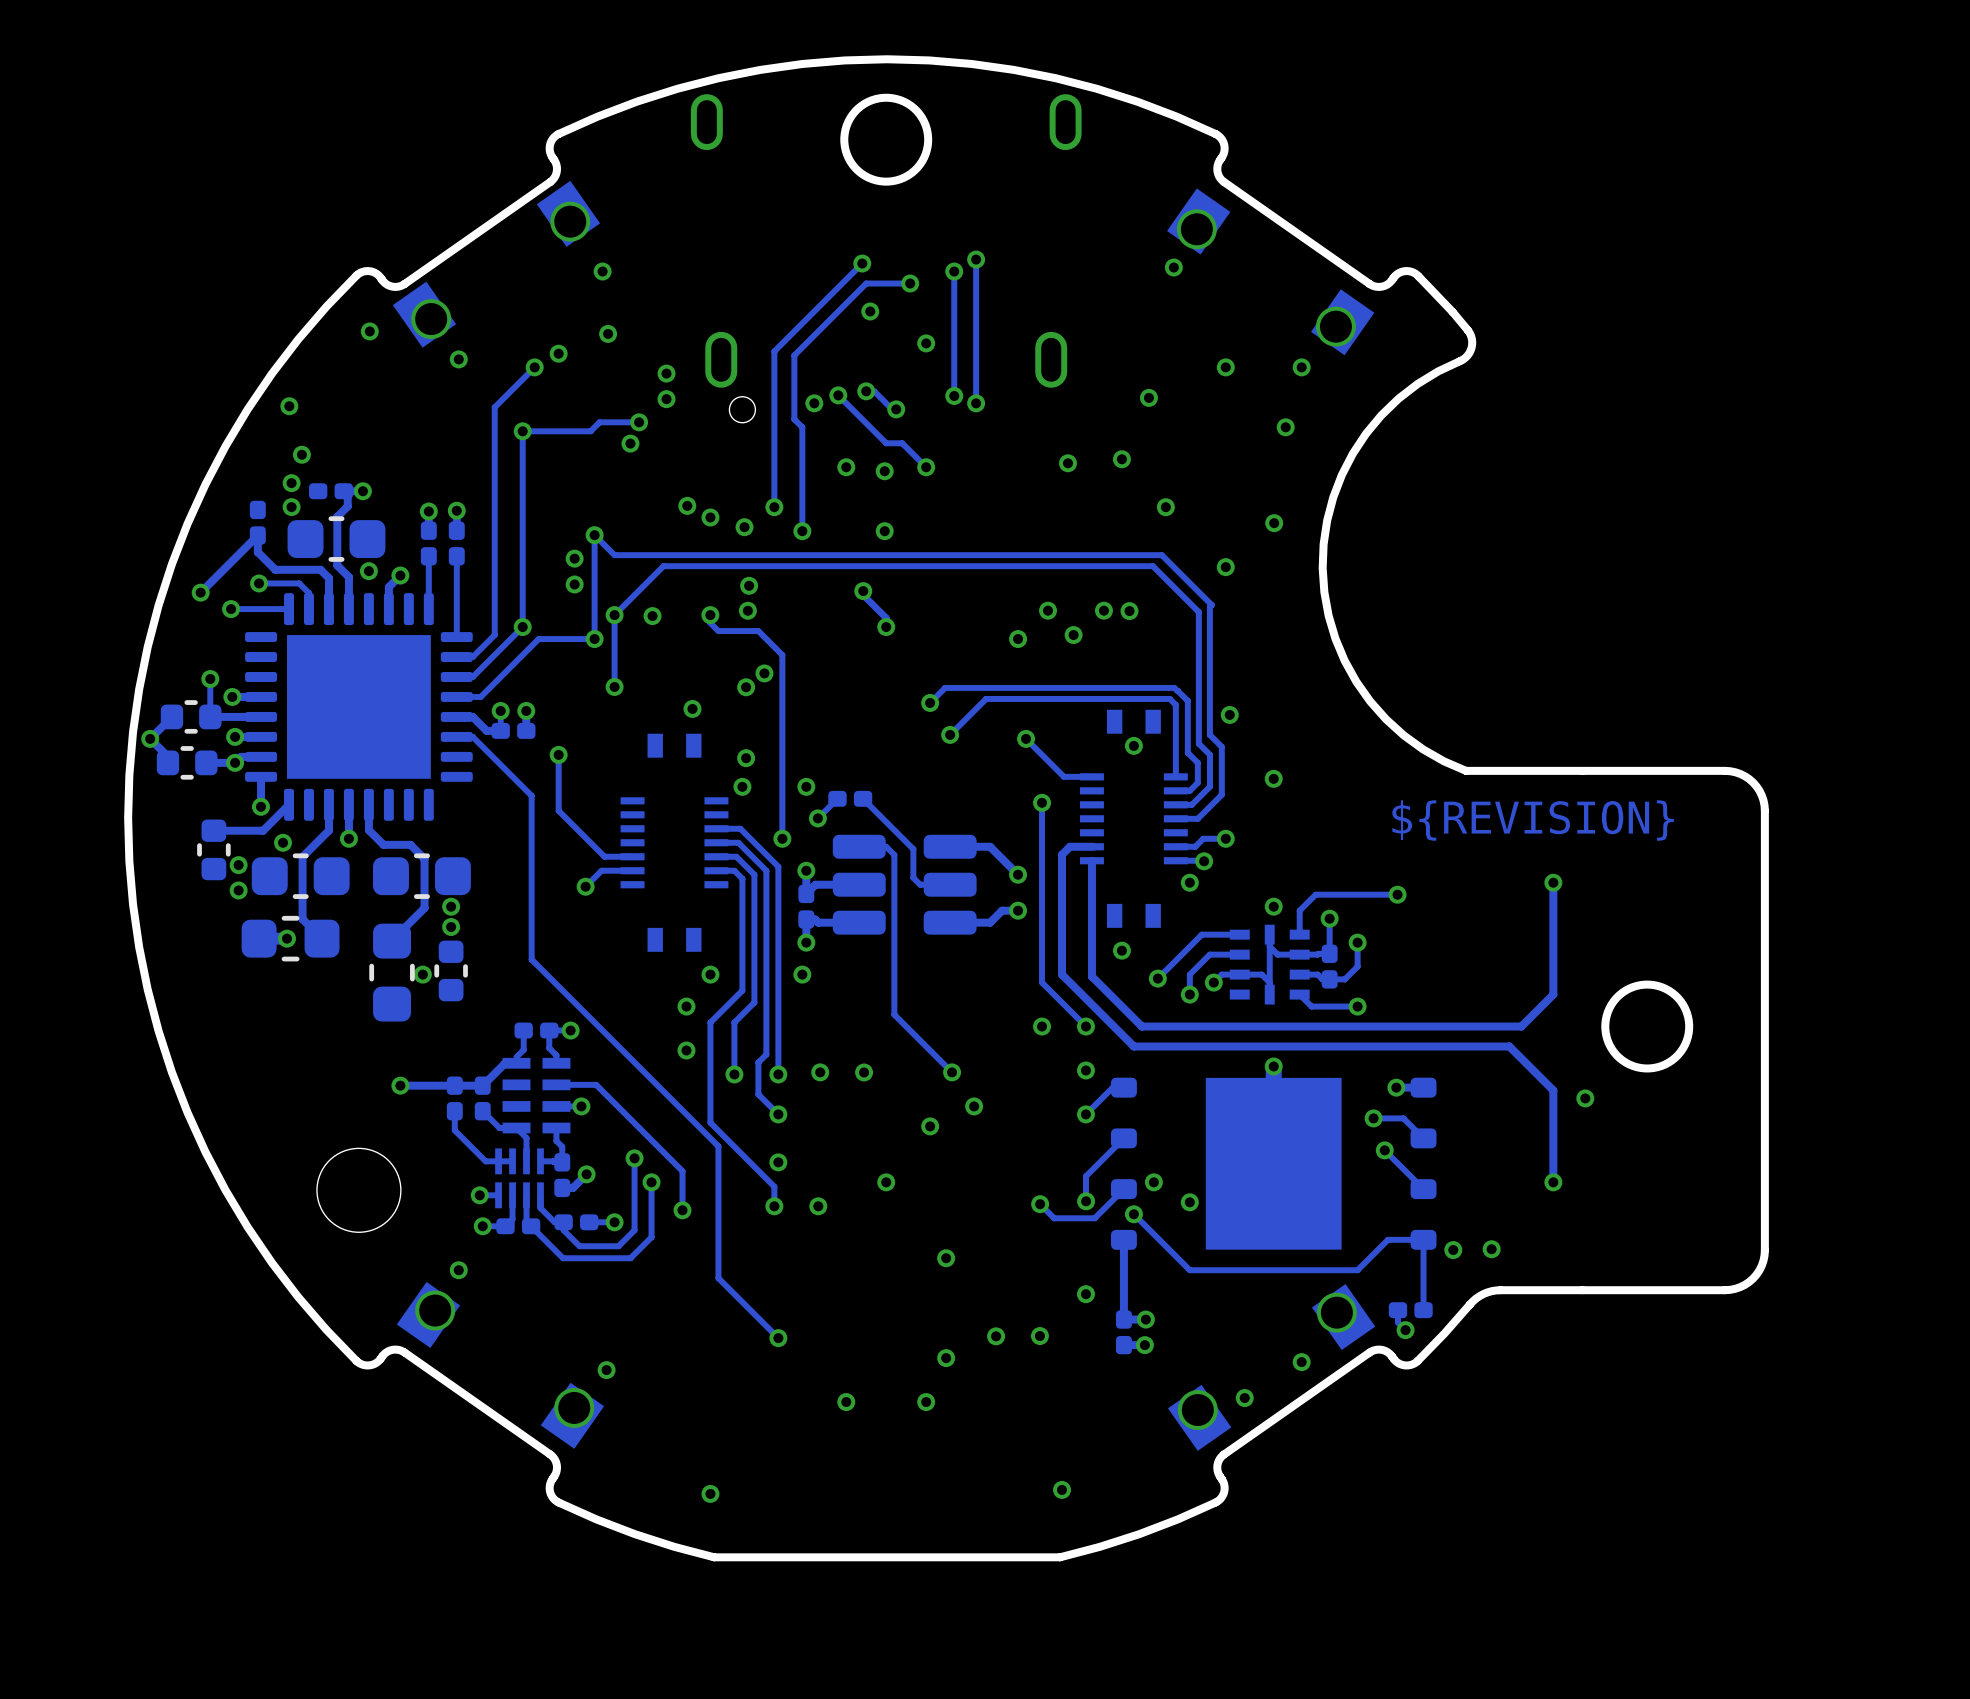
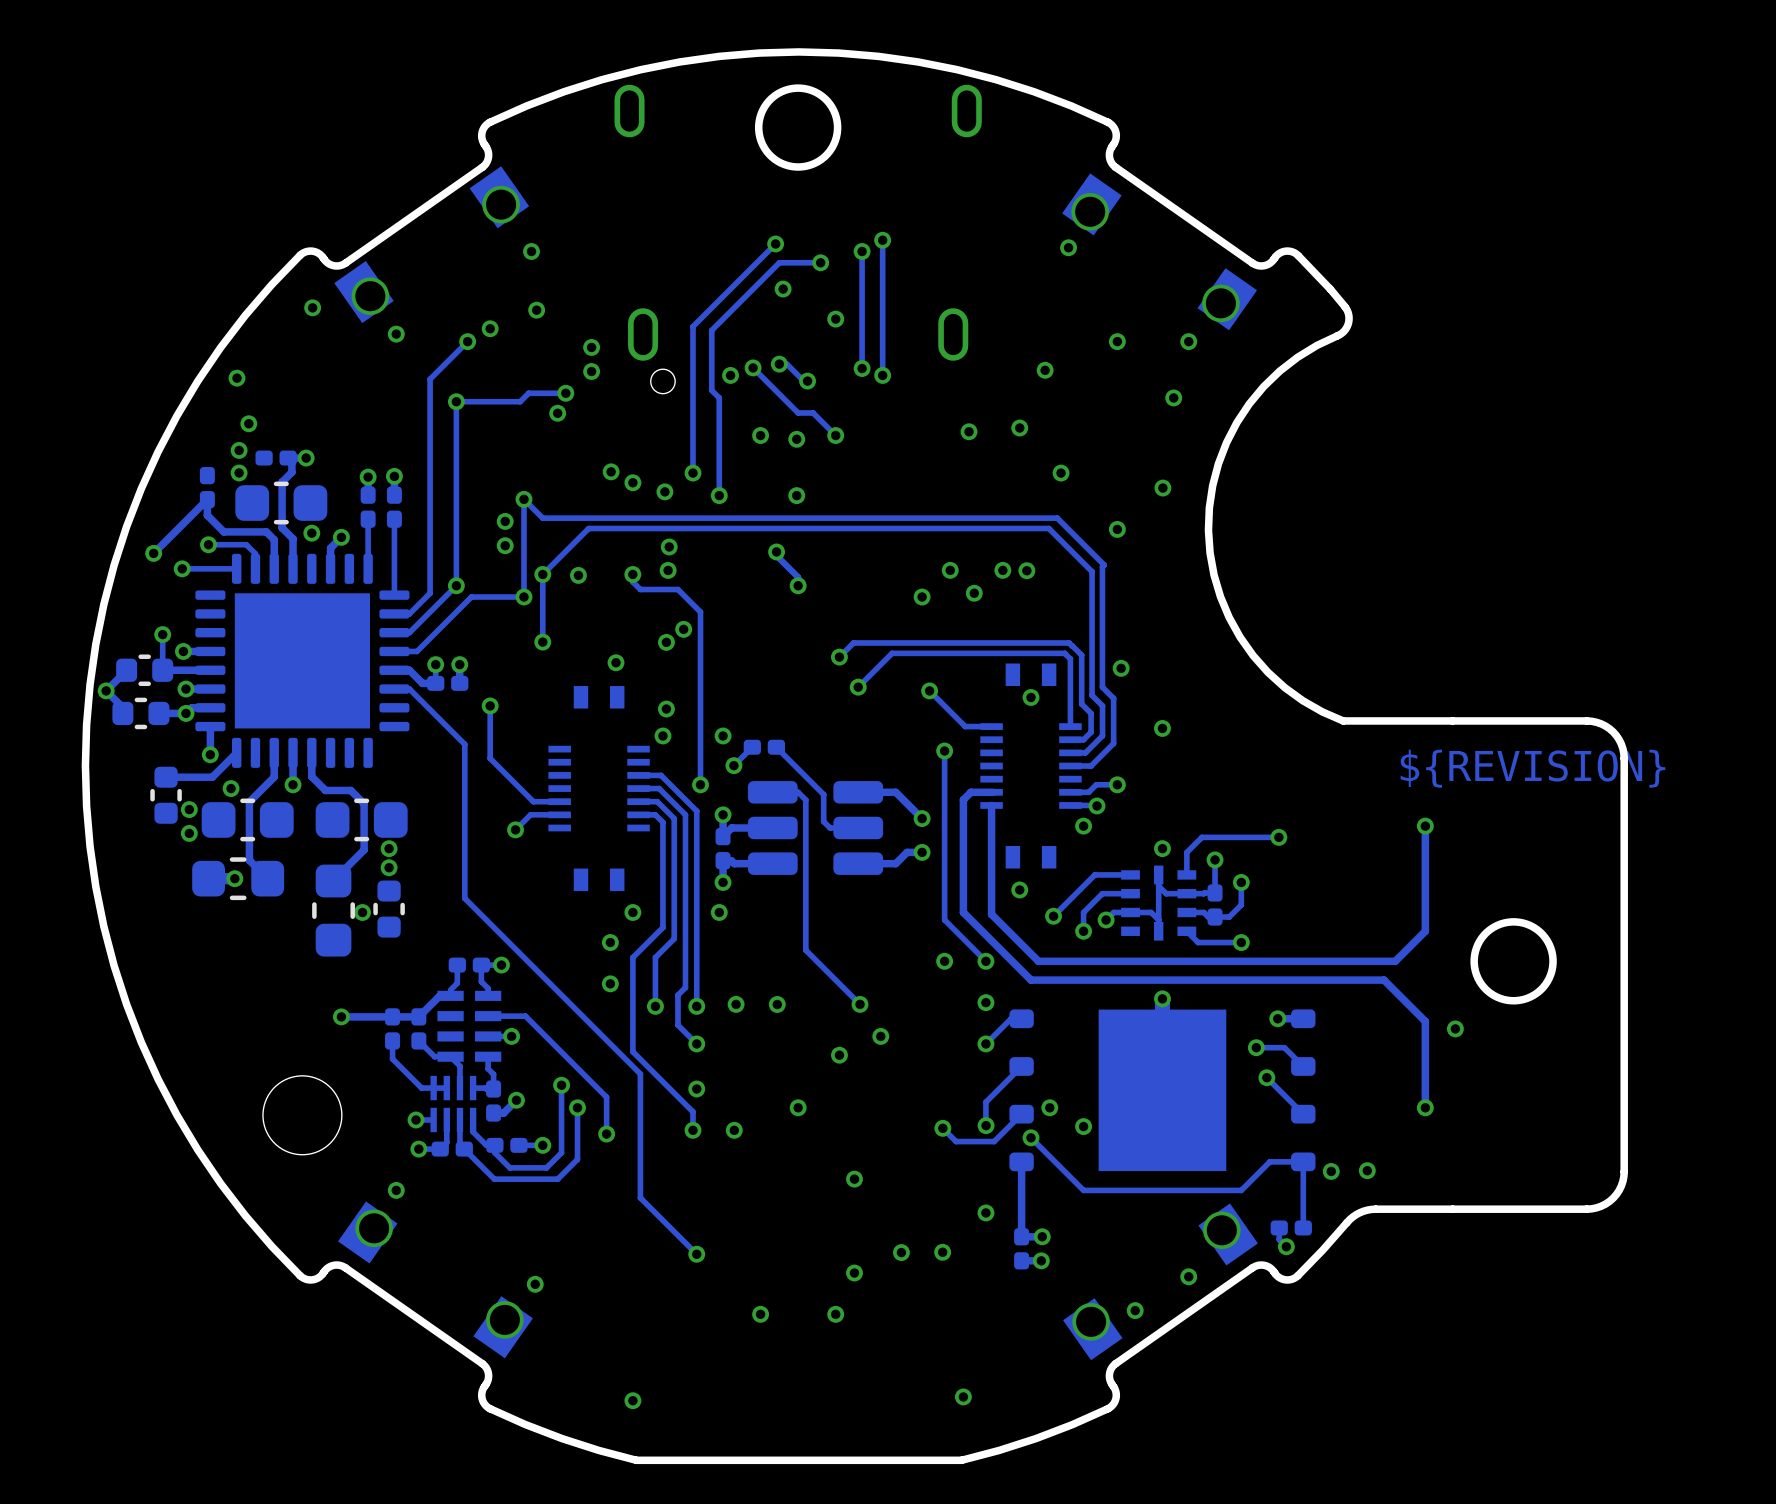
text position: ${REVISION} (1533, 820) -> ${REVISION} (1532, 768)

